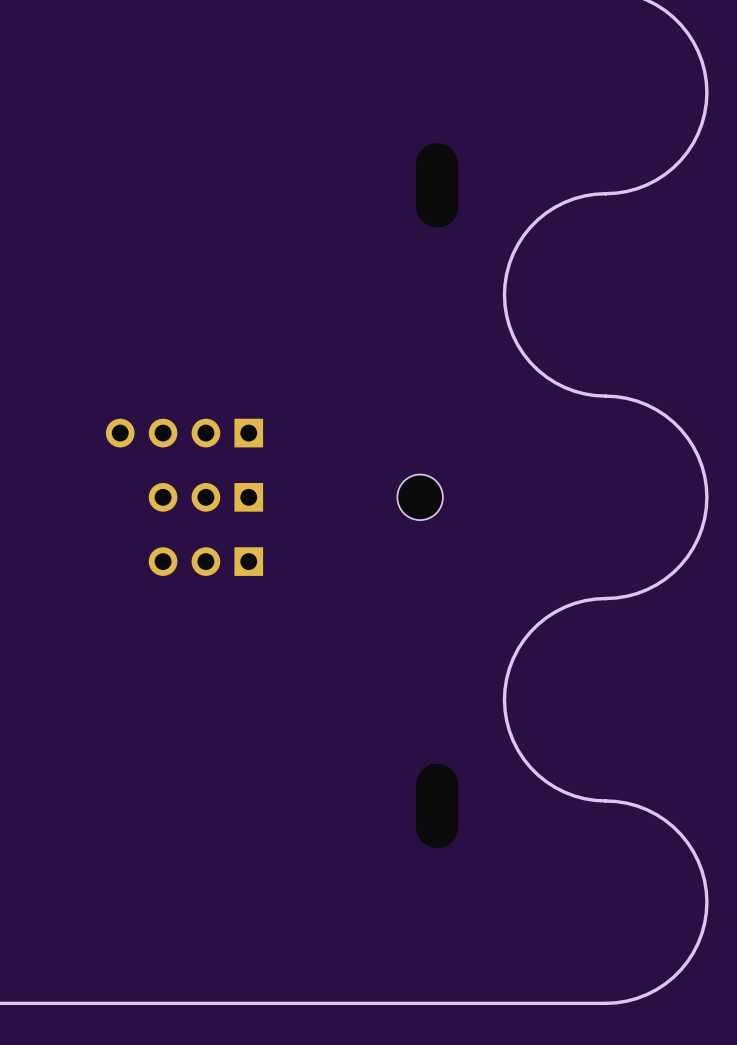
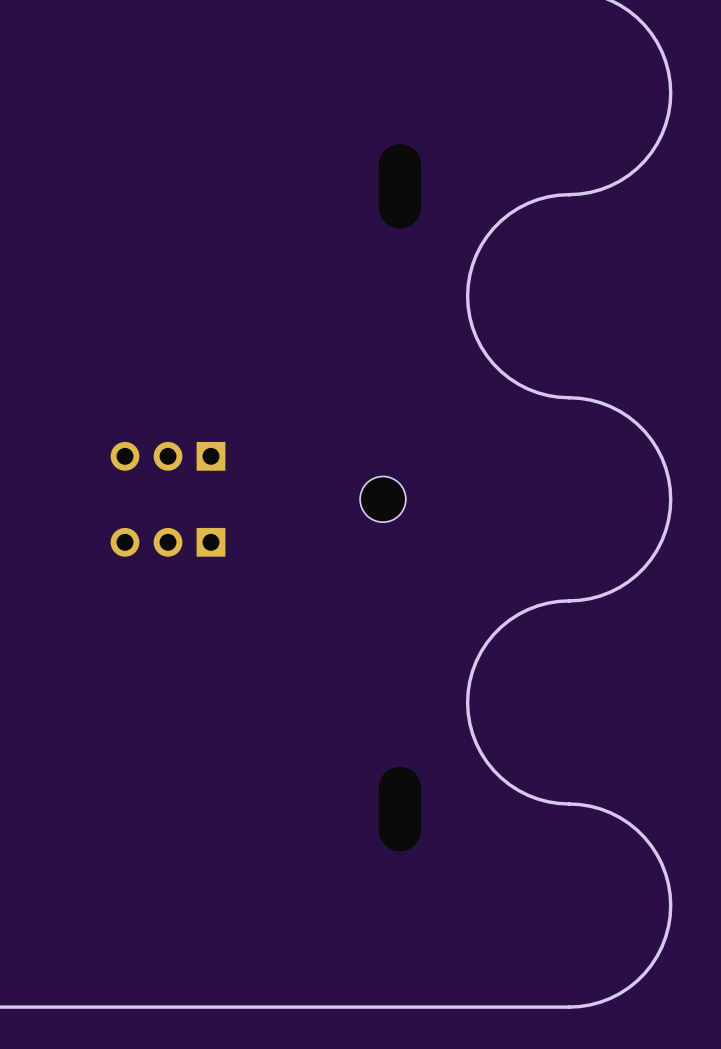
part: (184, 433) -> none
part: none -> (168, 456)
part: (205, 497) -> none
part: none -> (168, 542)
part: (205, 561) -> none

